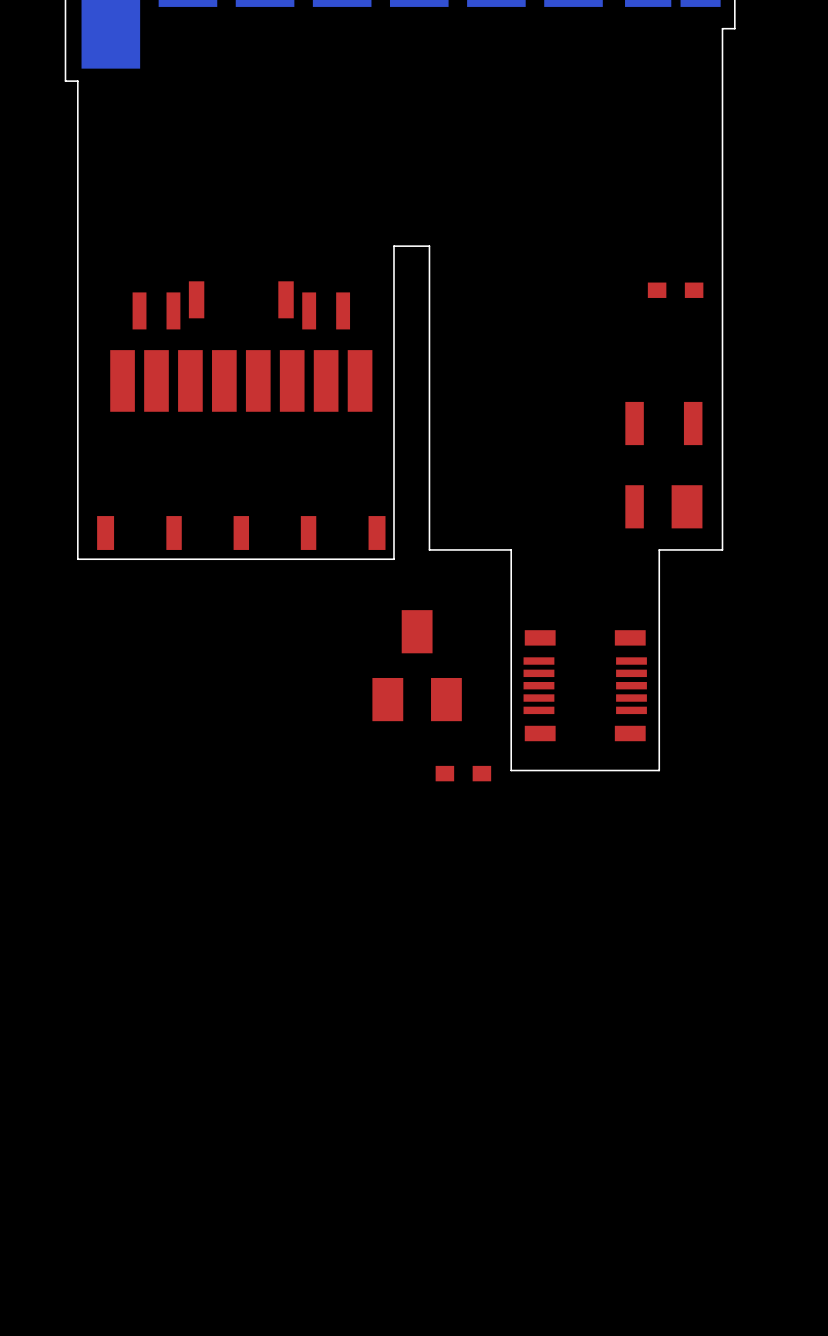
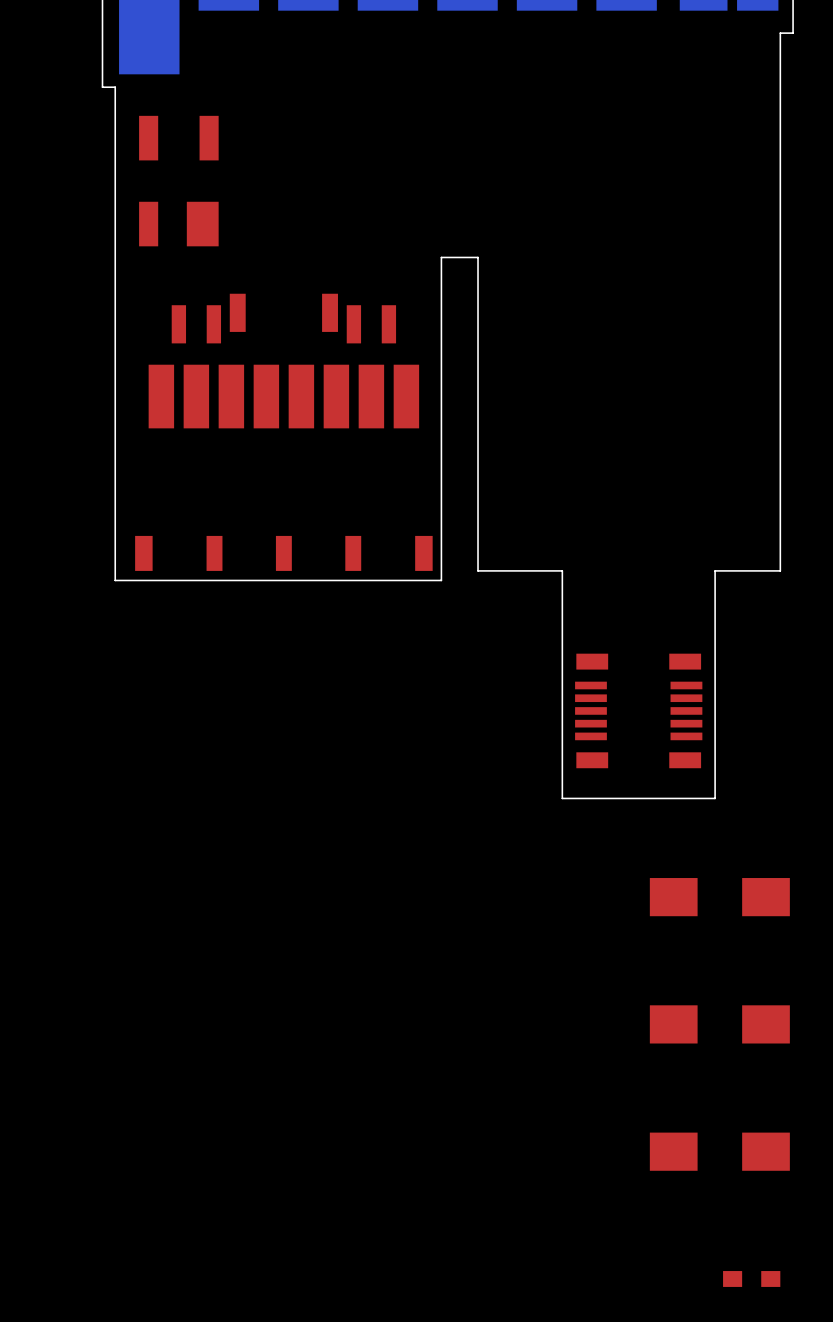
part: (675, 290) -> none
part position: (663, 465) -> (178, 181)
part: (417, 665) -> none
part: (463, 773) -> none
part: none -> (719, 897)
part: none -> (719, 1024)
part: none -> (719, 1151)
part: none -> (751, 1278)

